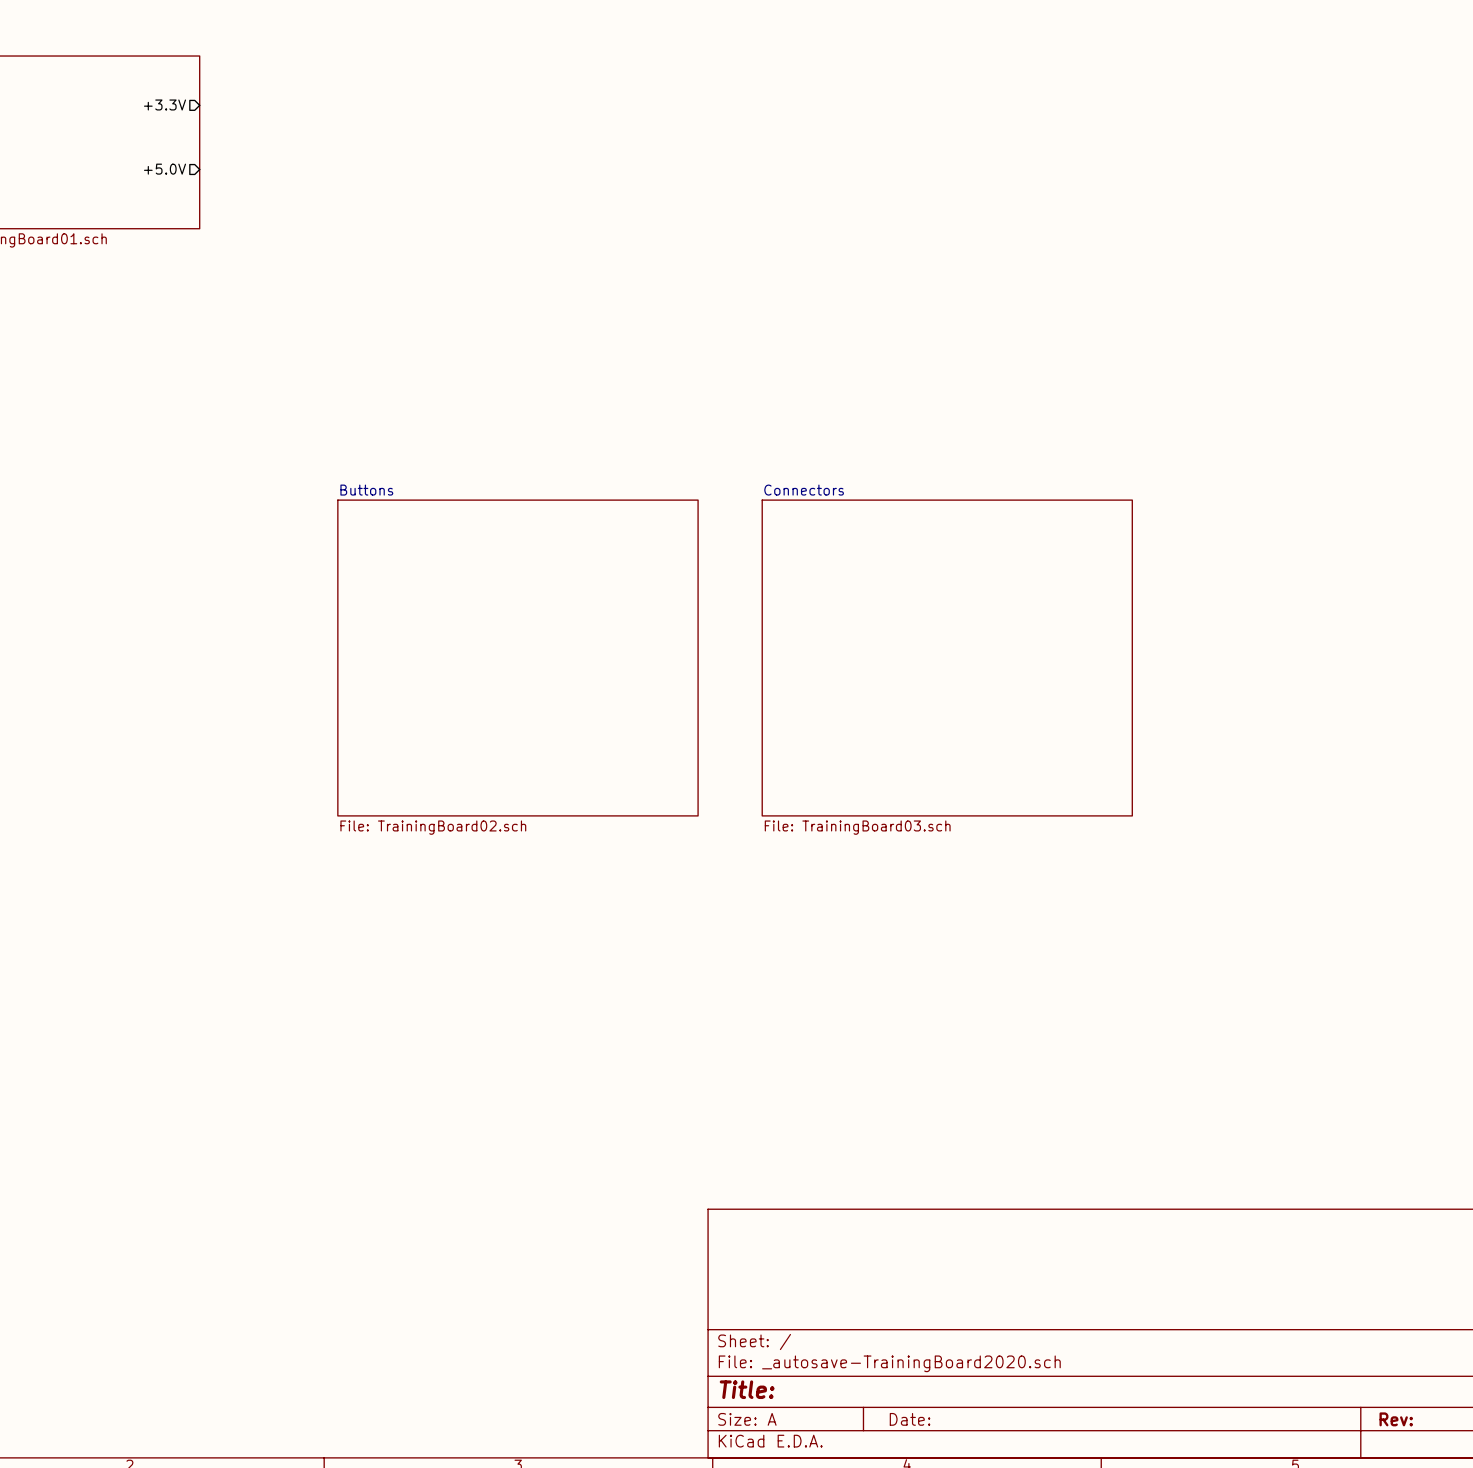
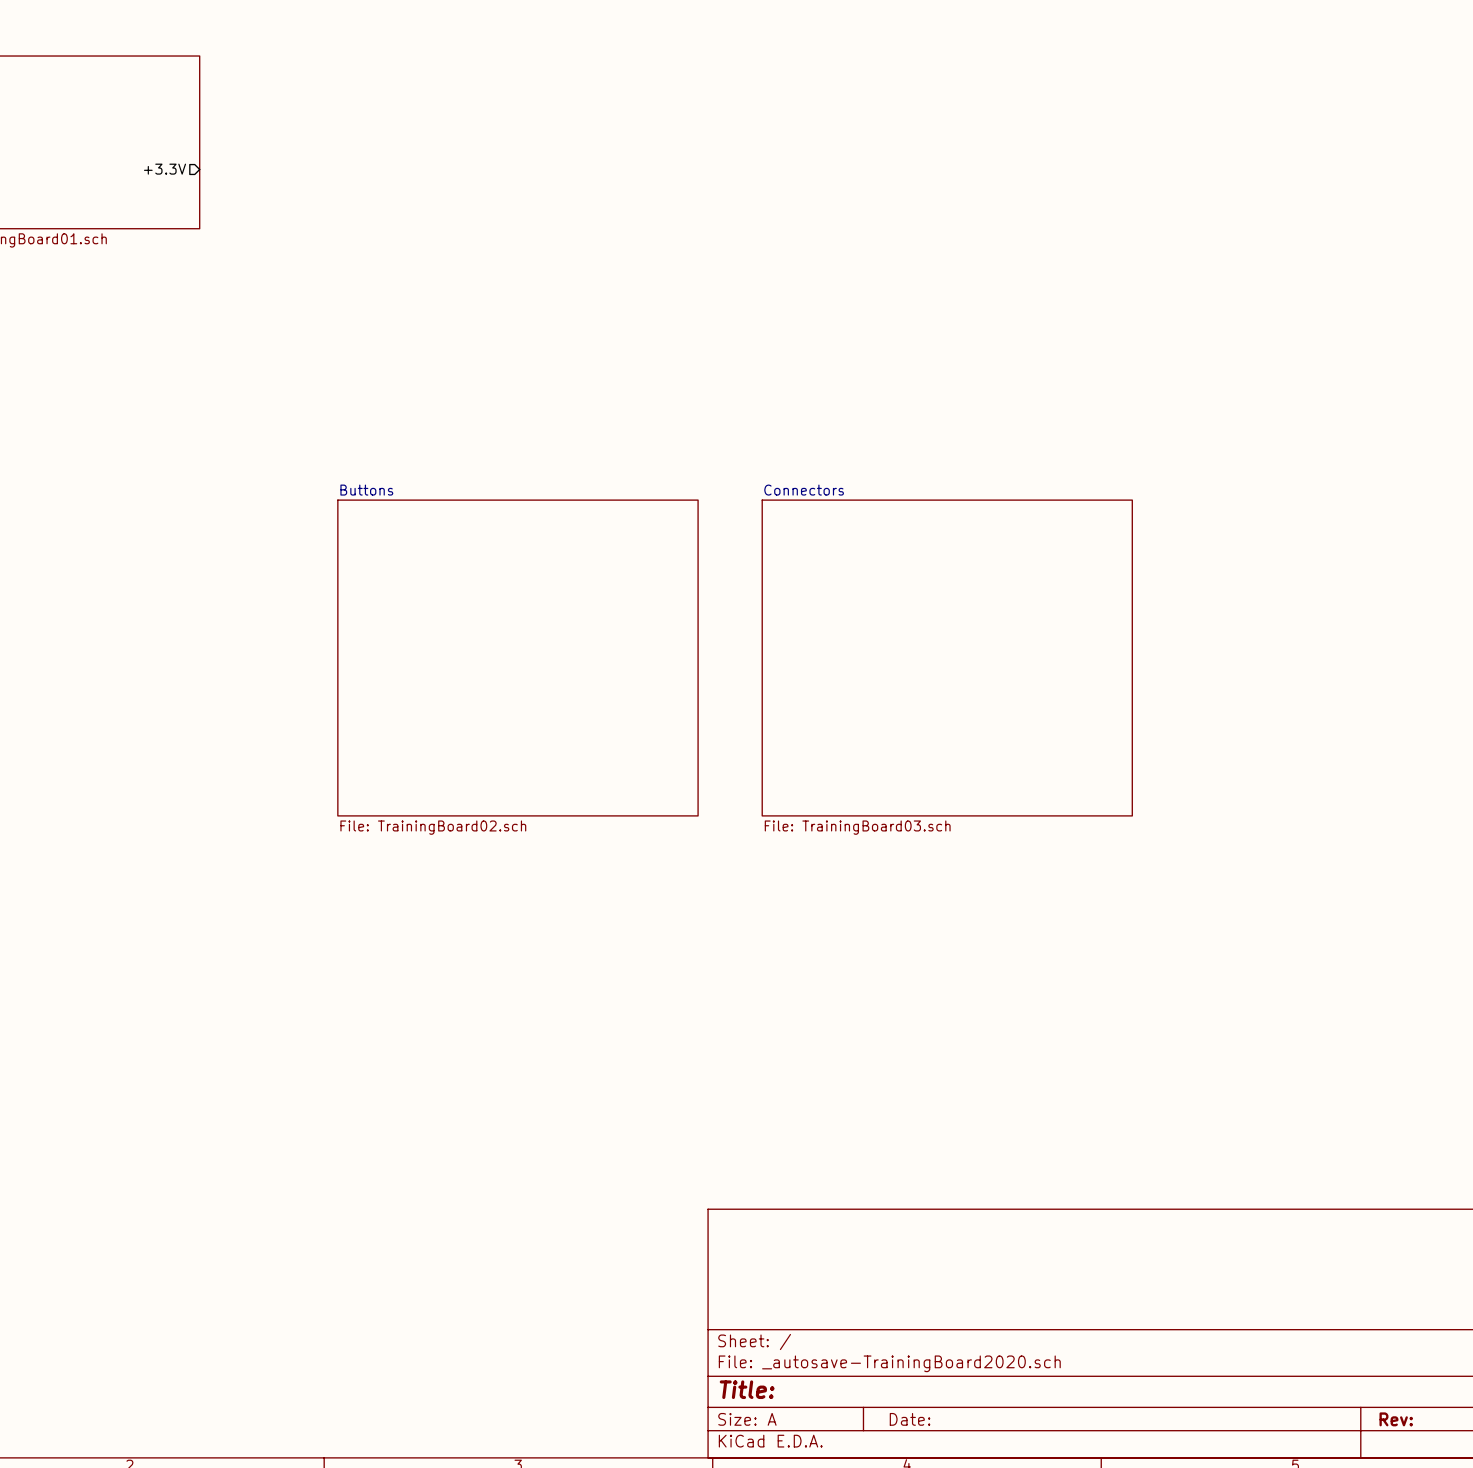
sheet pin: +3.3V (165, 104) -> none
sheet pin: +5.0V (165, 169) -> +3.3V (165, 169)

